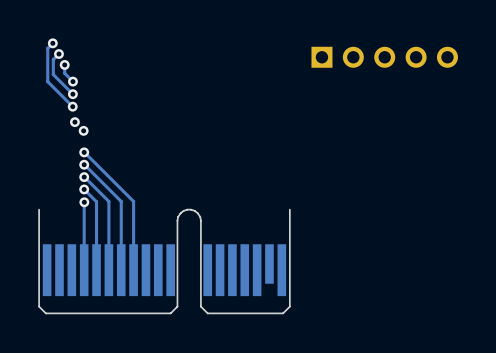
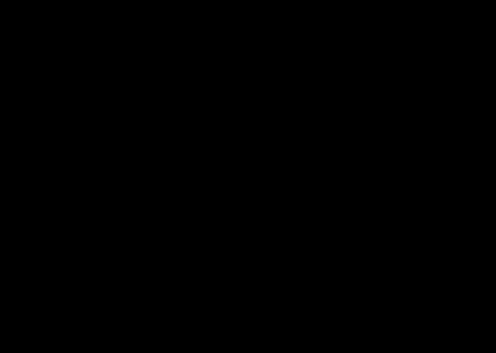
track: (52, 43) (47, 48) (47, 81) (72, 106) -> none
via: (52, 43) -> none
track: (58, 54) (53, 59) (53, 74) (72, 94) -> none
via: (58, 54) -> none
part: (384, 57) -> none
track: (64, 64) (64, 73) (72, 81) -> none
via: (64, 64) -> none
via: (72, 81) -> none
via: (72, 94) -> none
via: (72, 106) -> none
via: (74, 122) -> none
via: (83, 130) -> none
track: (84, 152) (133, 201) (133, 270) -> none
via: (84, 152) -> none
track: (84, 164) (121, 201) (121, 270) -> none
via: (84, 164) -> none
track: (84, 177) (108, 201) (108, 270) -> none
via: (84, 177) -> none
track: (84, 189) (96, 201) (96, 270) -> none
via: (84, 189) -> none
track: (84, 202) (84, 270) -> none
via: (84, 202) -> none
part: (164, 261) -> none

